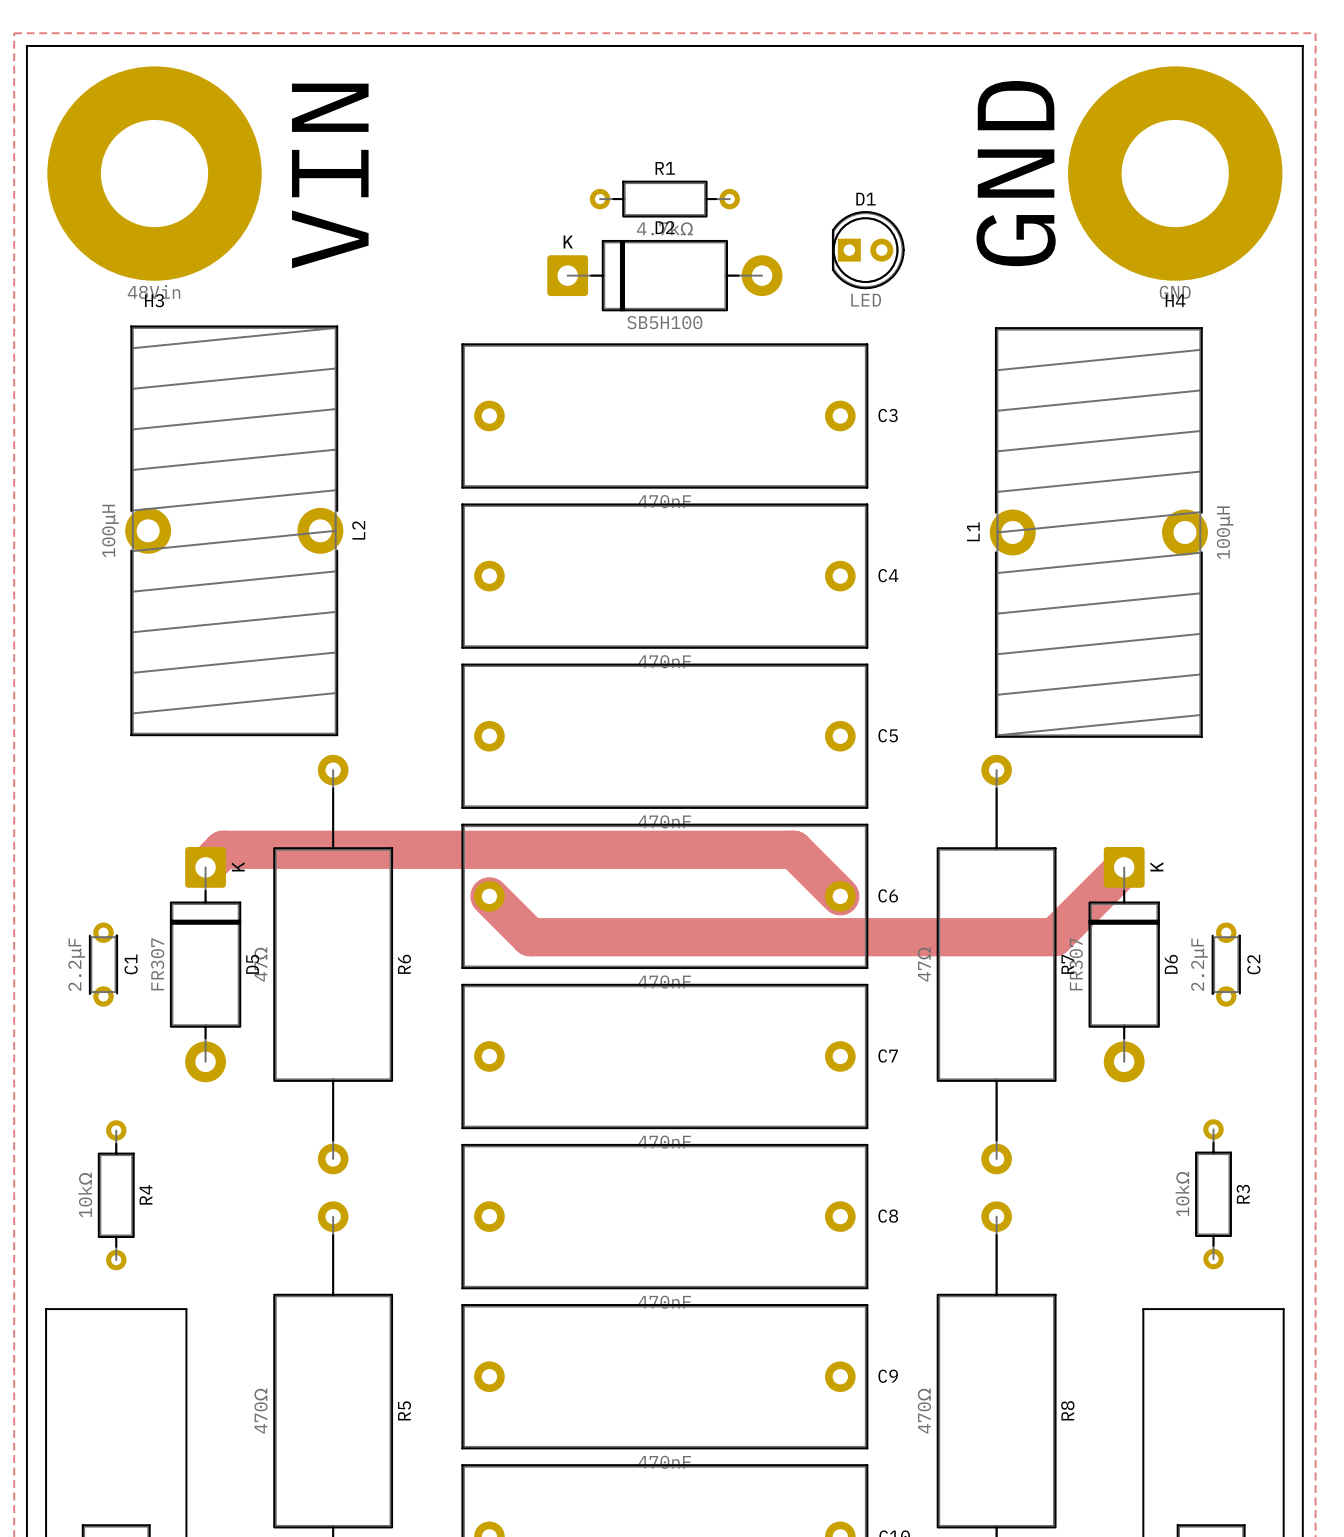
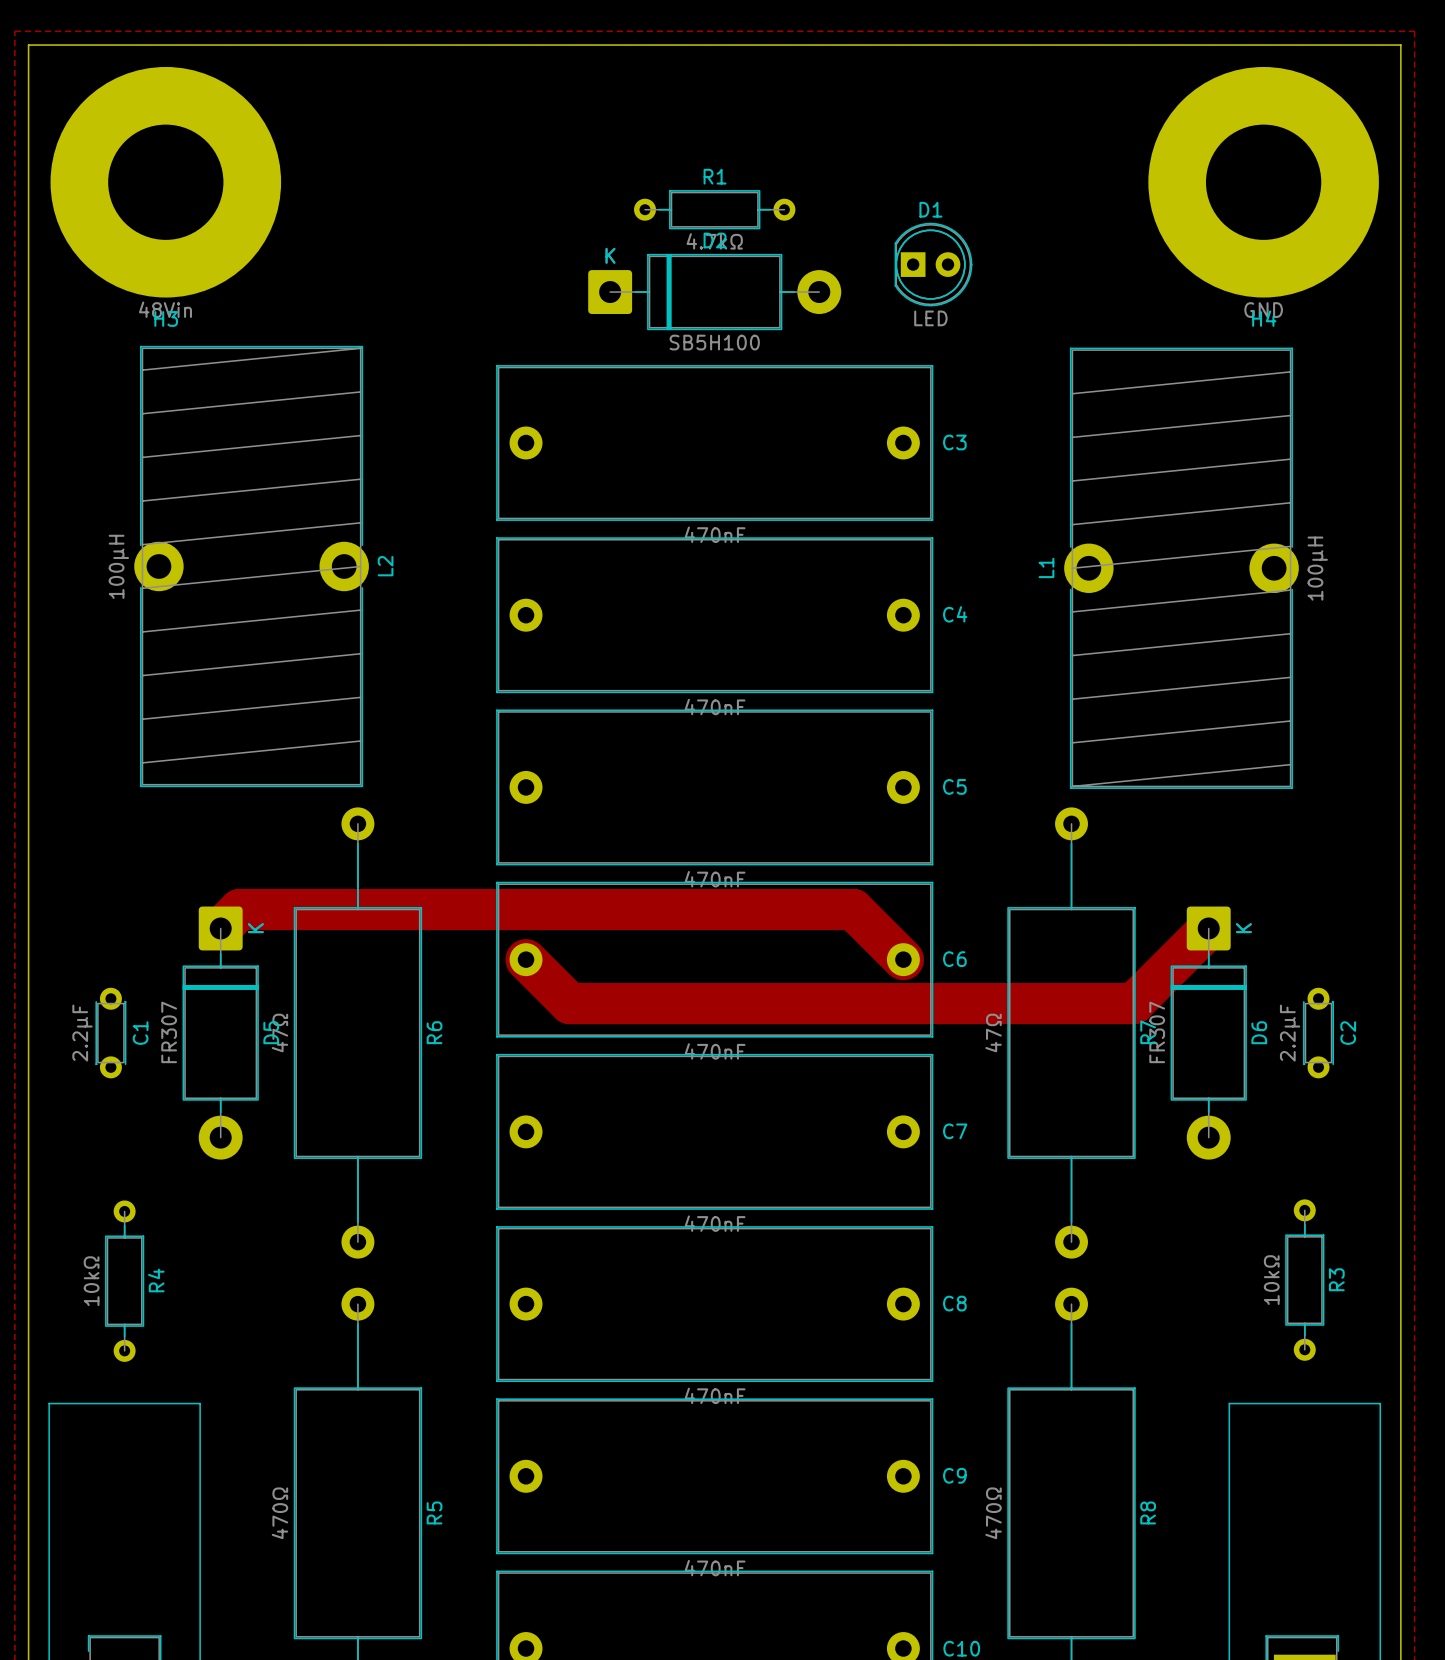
text: GND (1016, 173) -> none
text: VIN (330, 175) -> none

